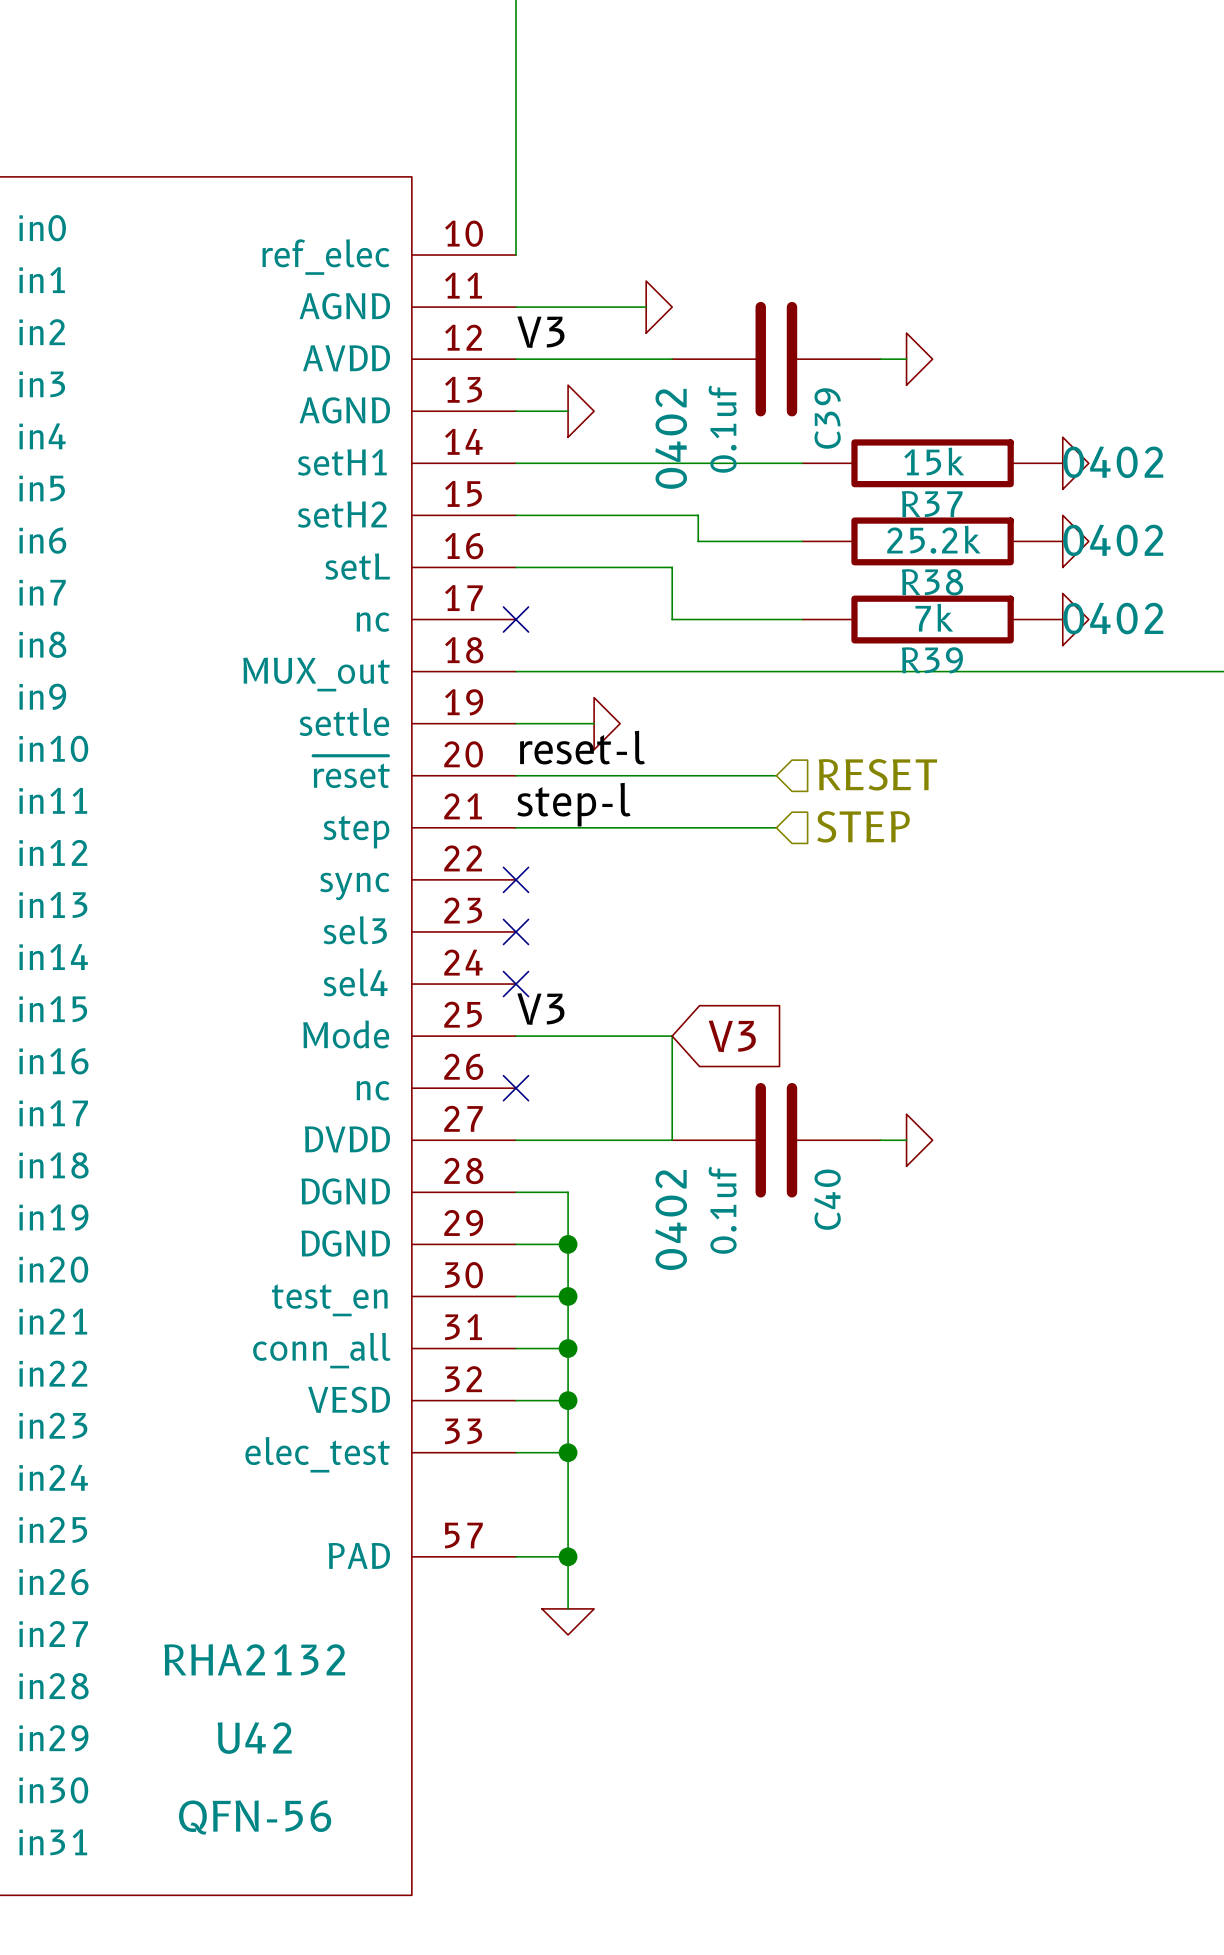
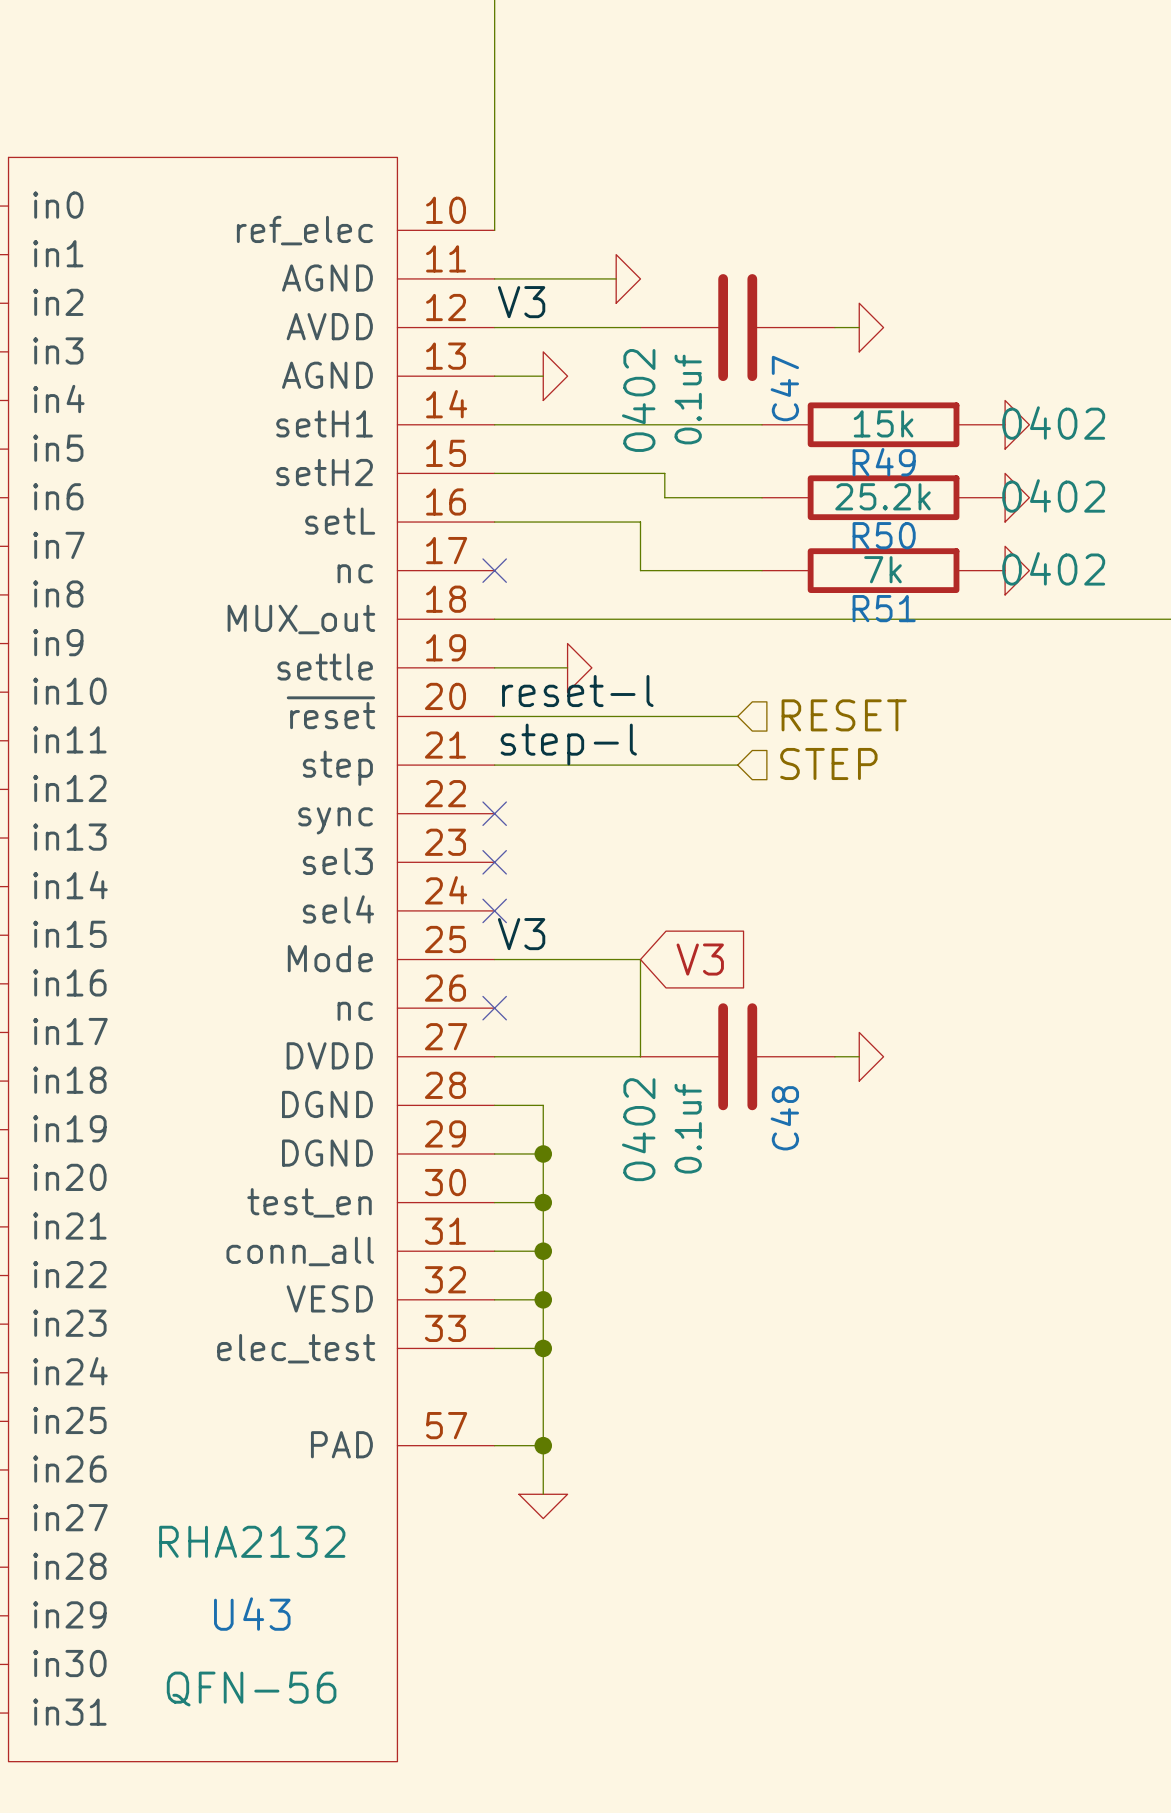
C39 name: C39 (827, 418) -> C47 (784, 388)
R37 name: R37 (932, 504) -> R49 (884, 462)
R38 name: R38 (932, 582) -> R50 (884, 535)
R39 name: R39 (932, 660) -> R51 (884, 608)
C40 name: C40 (827, 1199) -> C48 (784, 1118)
U42 name: U42 (254, 1738) -> U43 (252, 1614)

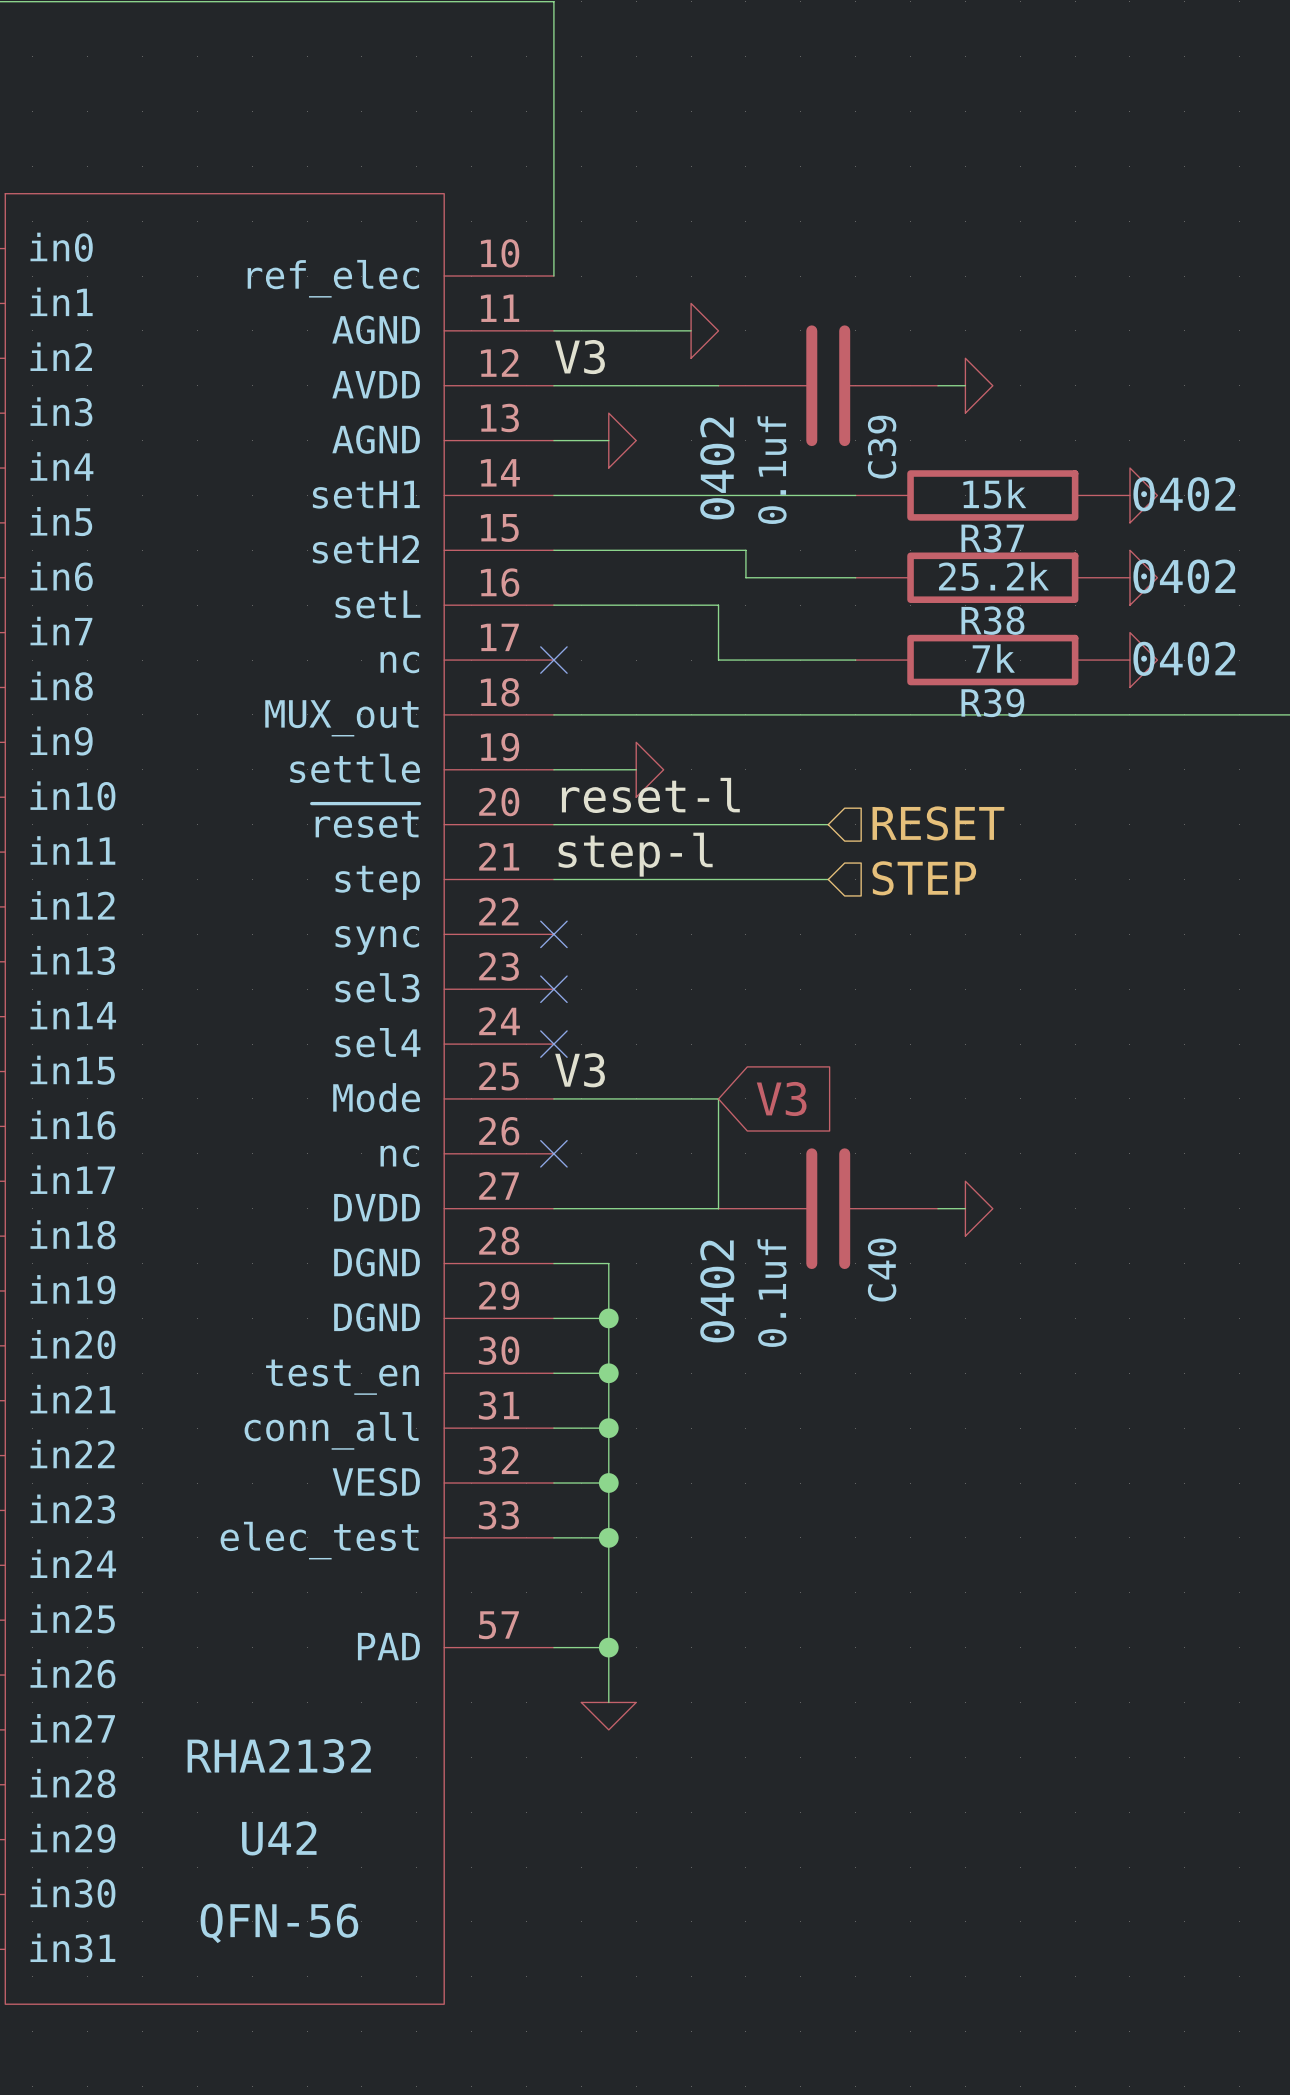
C47 name: C47 (784, 388) -> C39 (882, 447)
R49 name: R49 (884, 462) -> R37 (992, 538)
R50 name: R50 (884, 535) -> R38 (992, 620)
R51 name: R51 (884, 608) -> R39 (992, 702)
C48 name: C48 (784, 1118) -> C40 (882, 1270)
U43 name: U43 (252, 1614) -> U42 (279, 1838)

